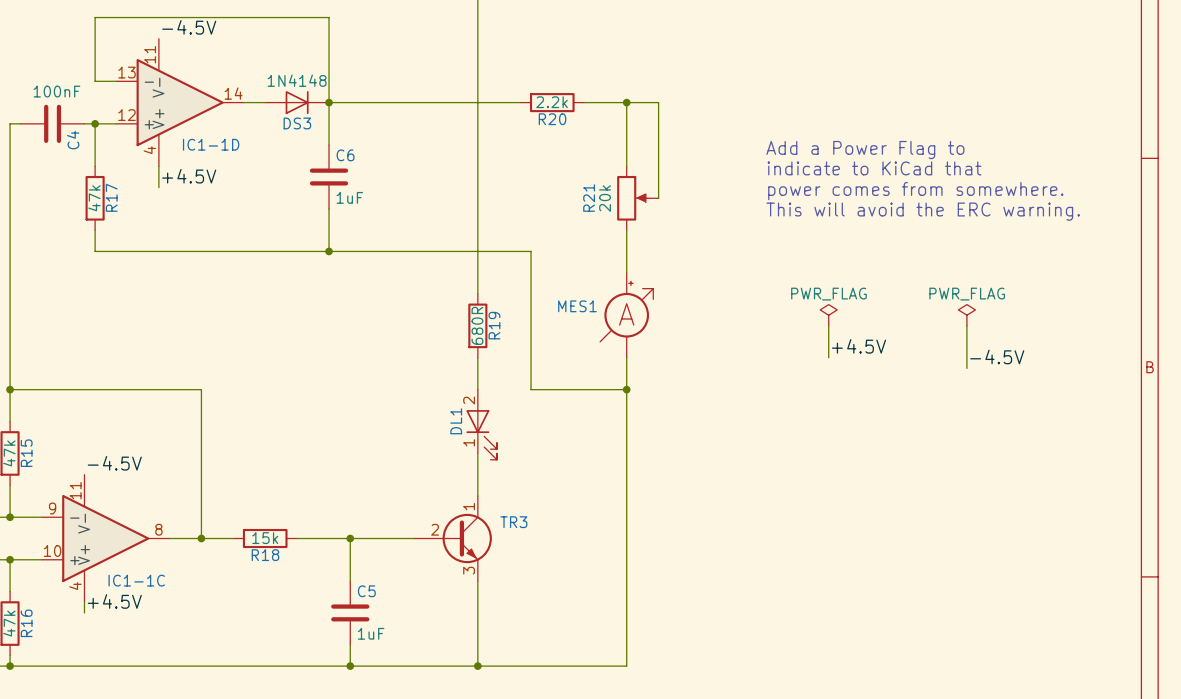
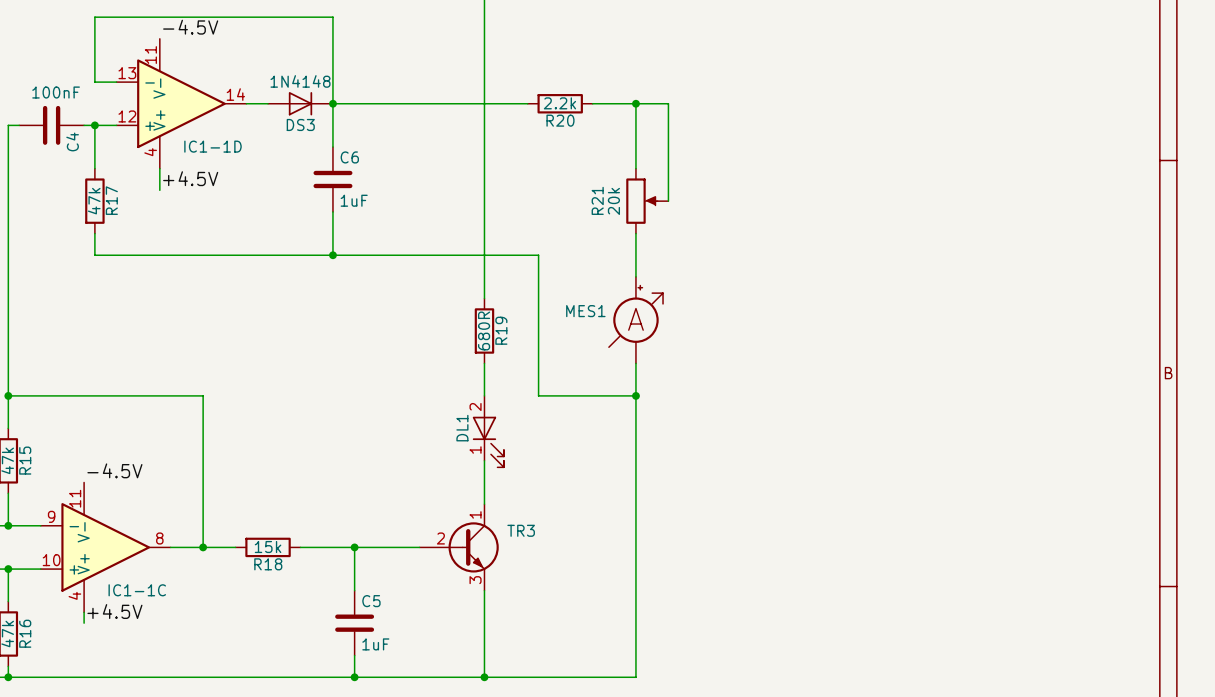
text: Add a Power Flag to (865, 150) -> none
text: indicate to KiCad that (874, 168) -> none
text: power comes from somewhere. (915, 191) -> none
text: This will avoid the ERC warning. (923, 211) -> none
power symbol: PWR_FLAG (828, 315) -> none
power symbol: PWR_FLAG (966, 315) -> none
wire: (828, 325) (828, 357) -> none
wire: (966, 325) (966, 368) -> none
label: +4.5V (859, 346) -> none
label: -4.5V (997, 356) -> none

